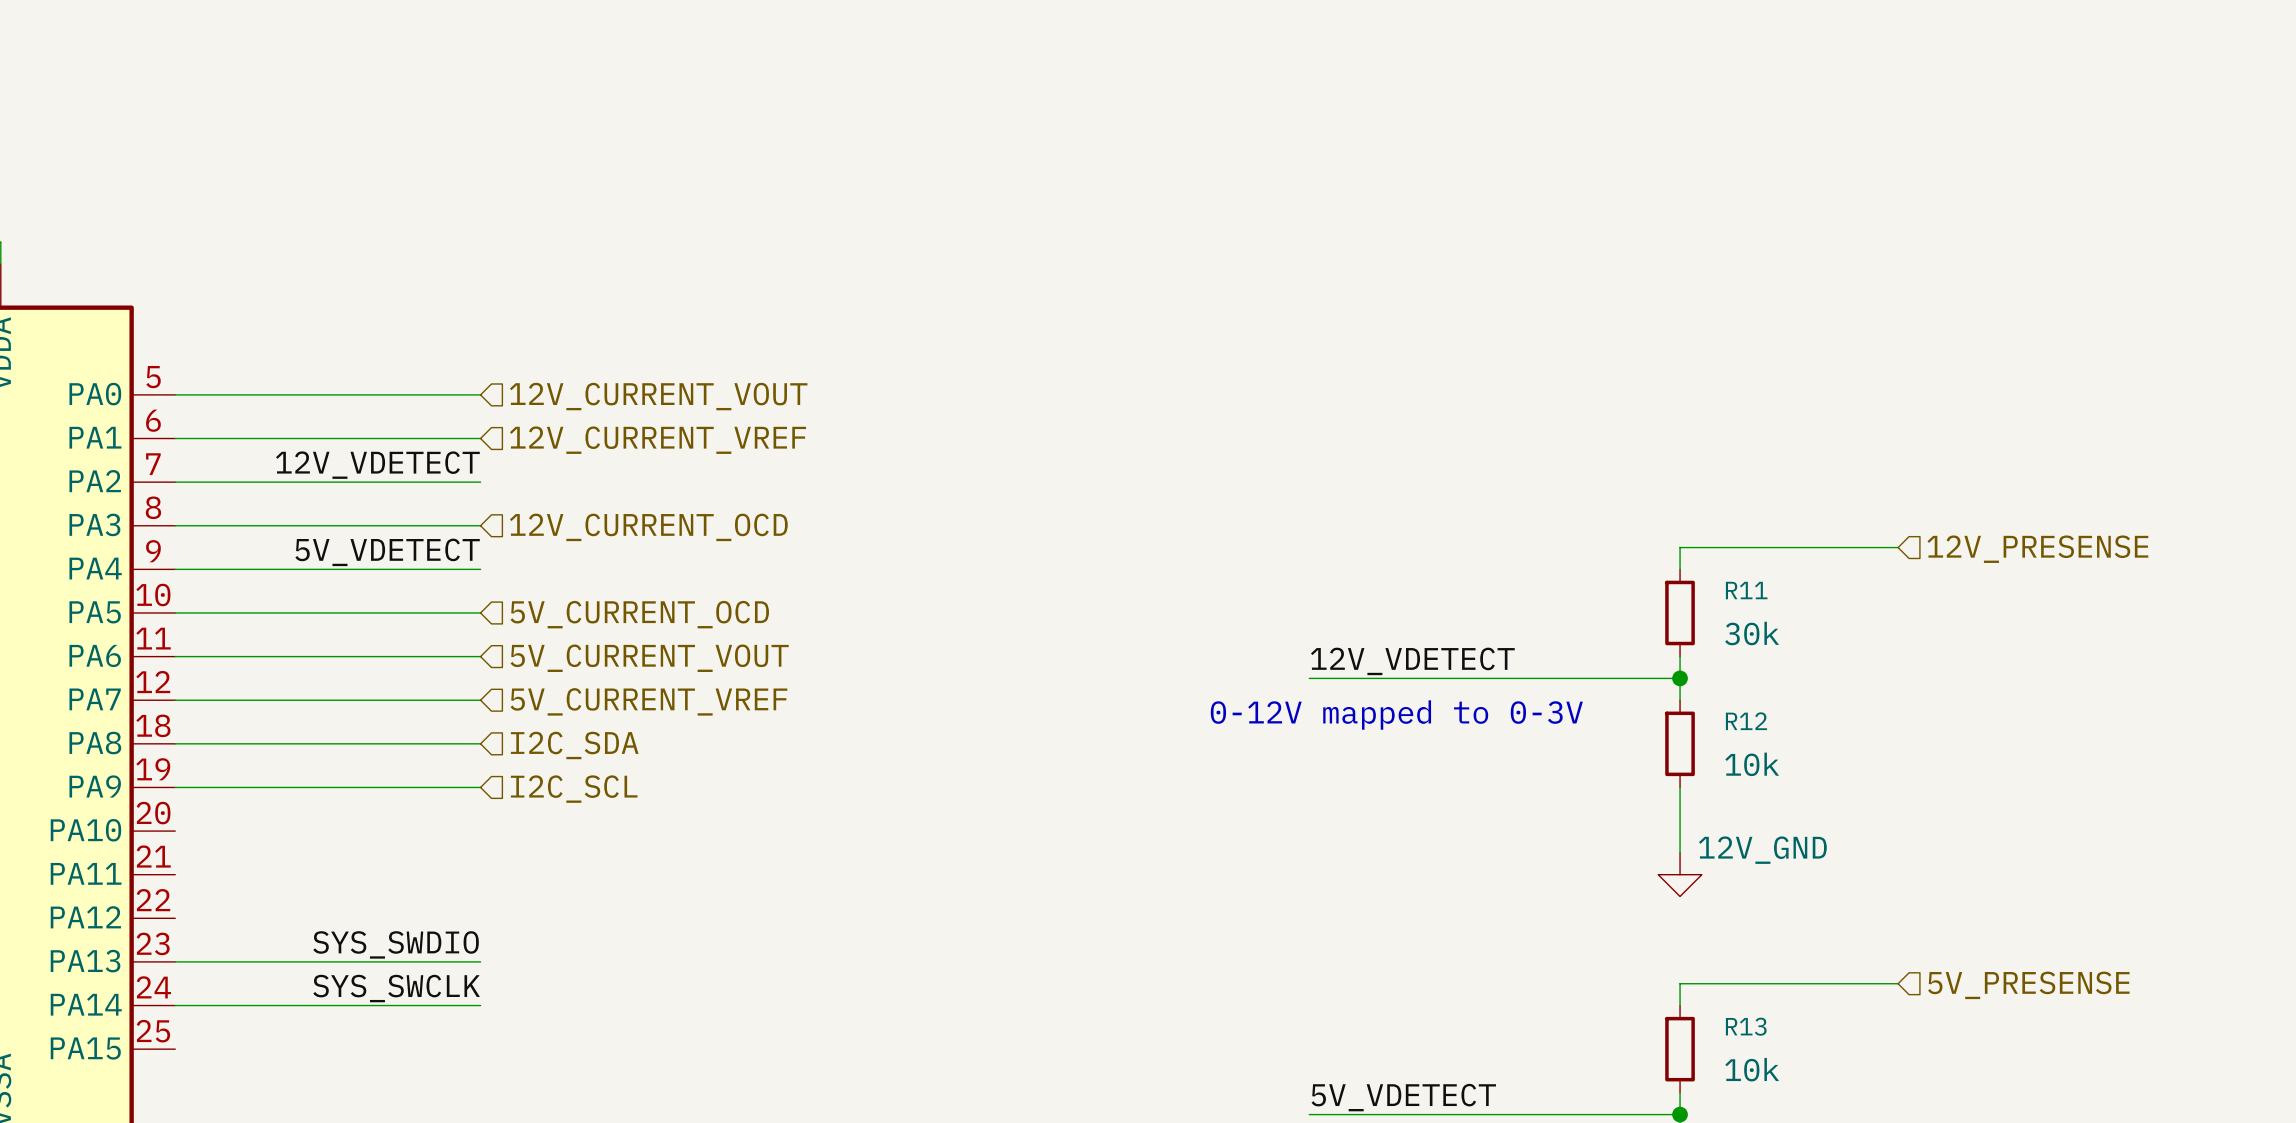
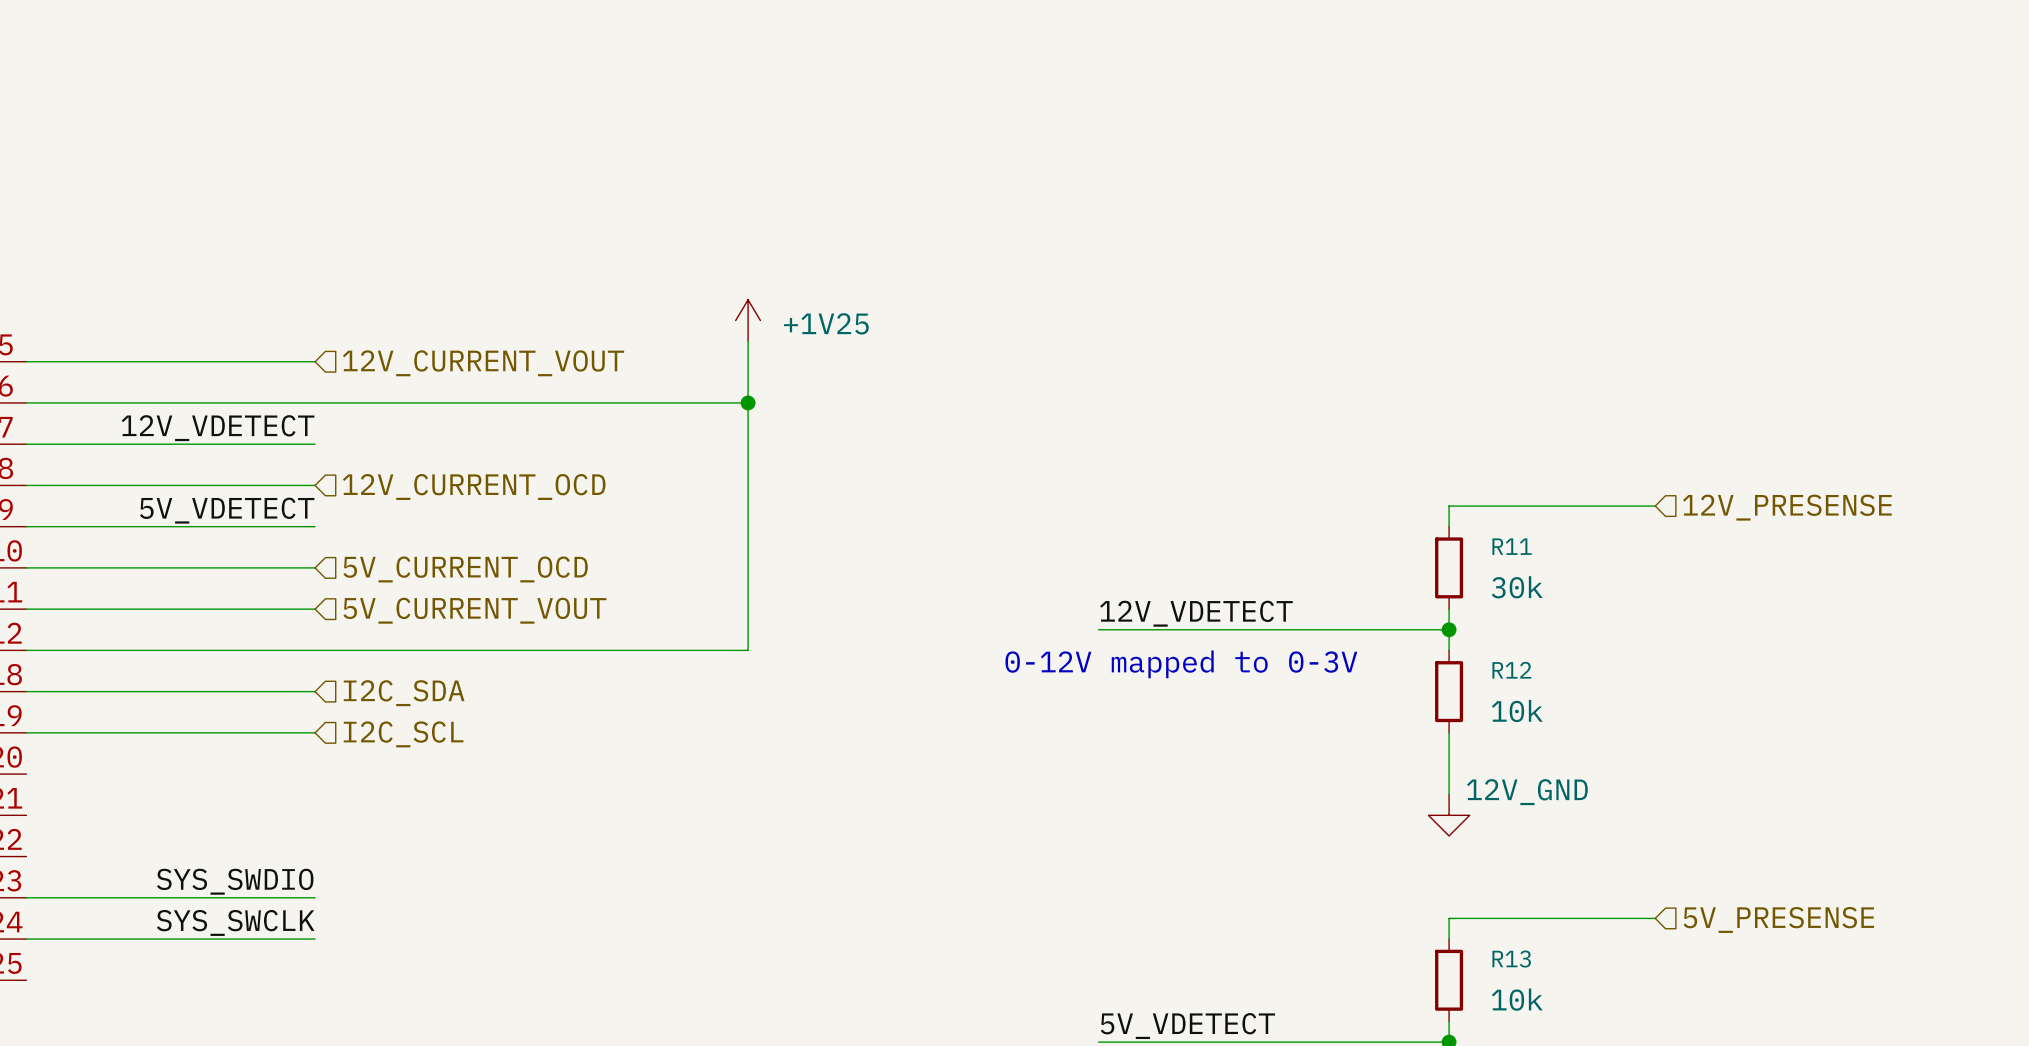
power symbol: none -> +1V25 (748, 320)
wire: none -> (748, 341) (748, 650) (315, 650)
wire: none -> (315, 402) (748, 402)
junction: none -> (748, 402)
hierarchical label: 12V_CURRENT_VREF (657, 440) -> none
hierarchical label: 5V_CURRENT_VREF (648, 701) -> none

